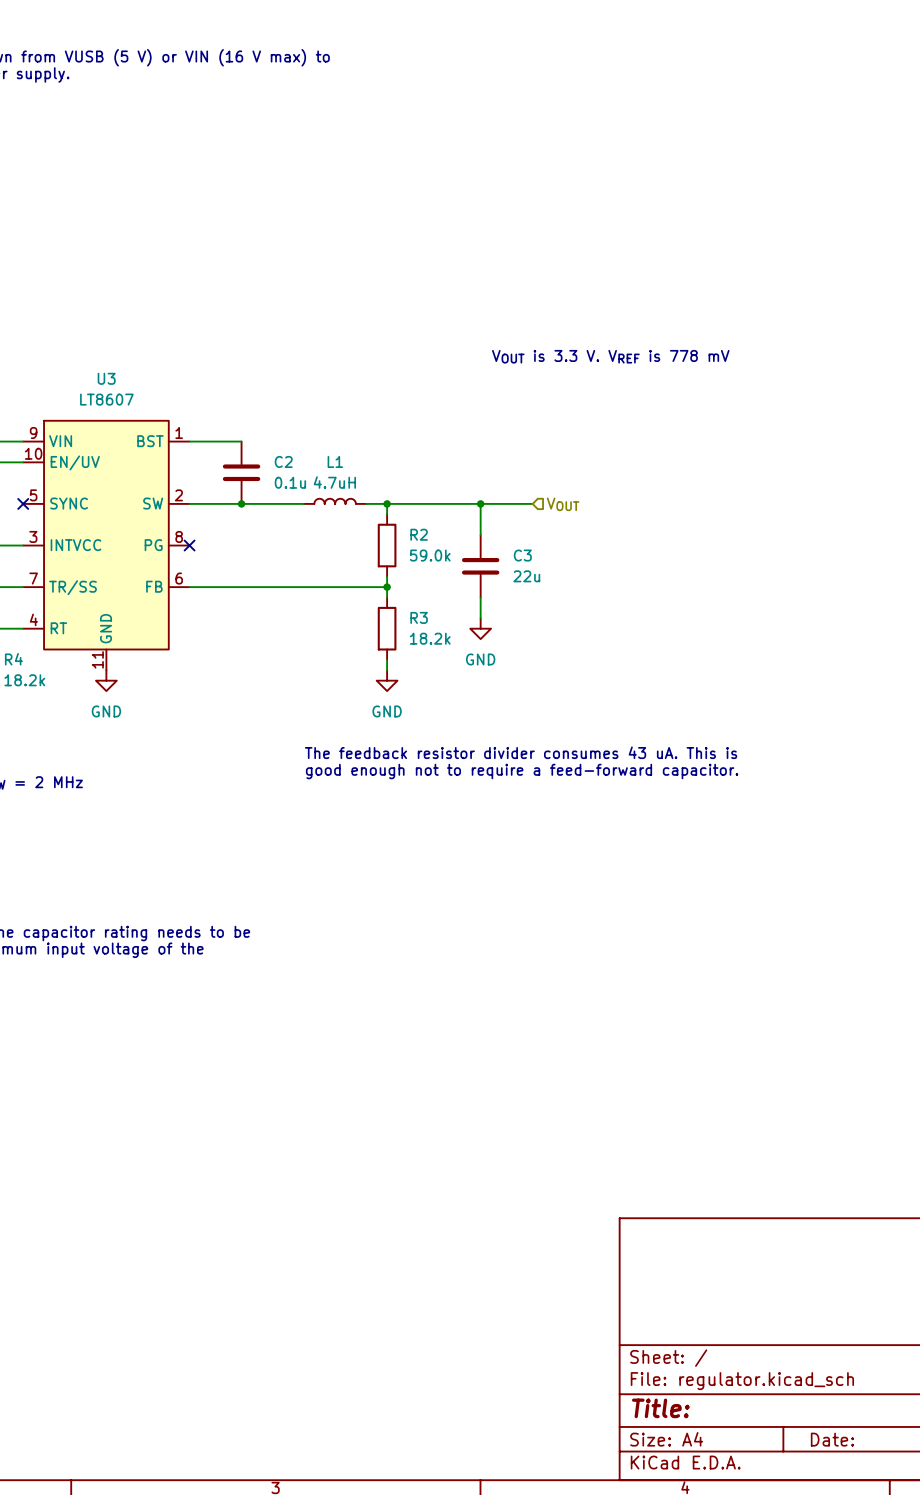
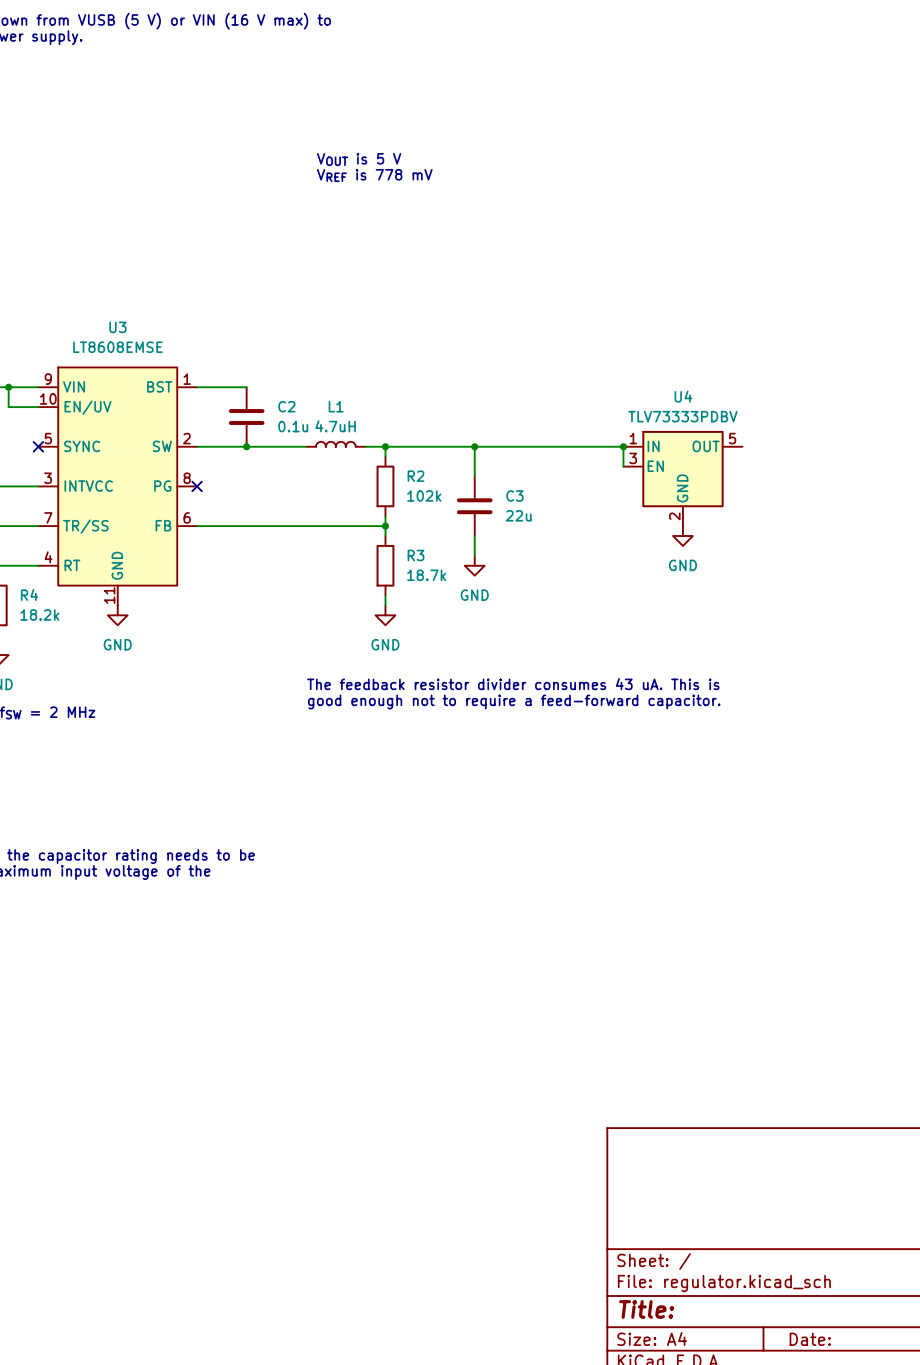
text: none -> VOUT is 5 V (359, 159)
text: none -> VREF is 778 mV (374, 175)
text: VOUT is 3.3 V. VREF is 778 mV (610, 356) -> none
U3 value: LT8607 (106, 399) -> LT8608EMSE (117, 347)
wire: none -> (524, 446) (623, 446) (623, 466)
junction: none -> (623, 446)
hierarchical label: VOUT (563, 504) -> none
U4: none -> TLV73333PDBV (682, 478)
R2 value: 59.0k (430, 555) -> 102k (424, 495)
power symbol: none -> GND (682, 536)
R3 value: 18.2k (430, 638) -> 18.7k (426, 575)

